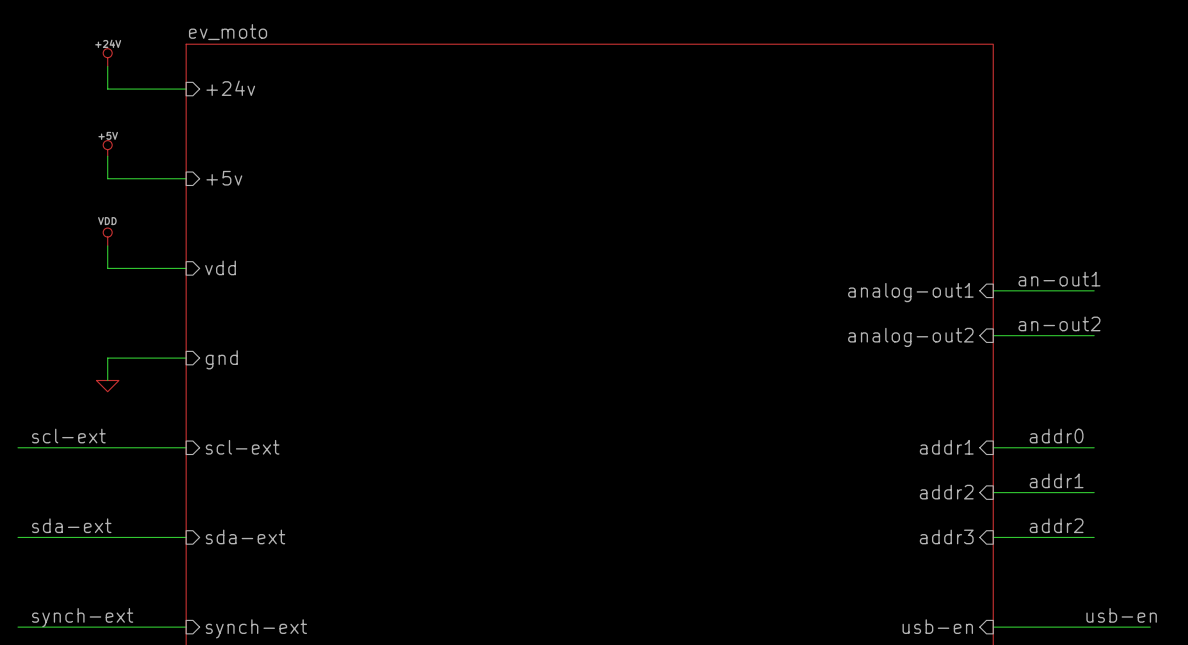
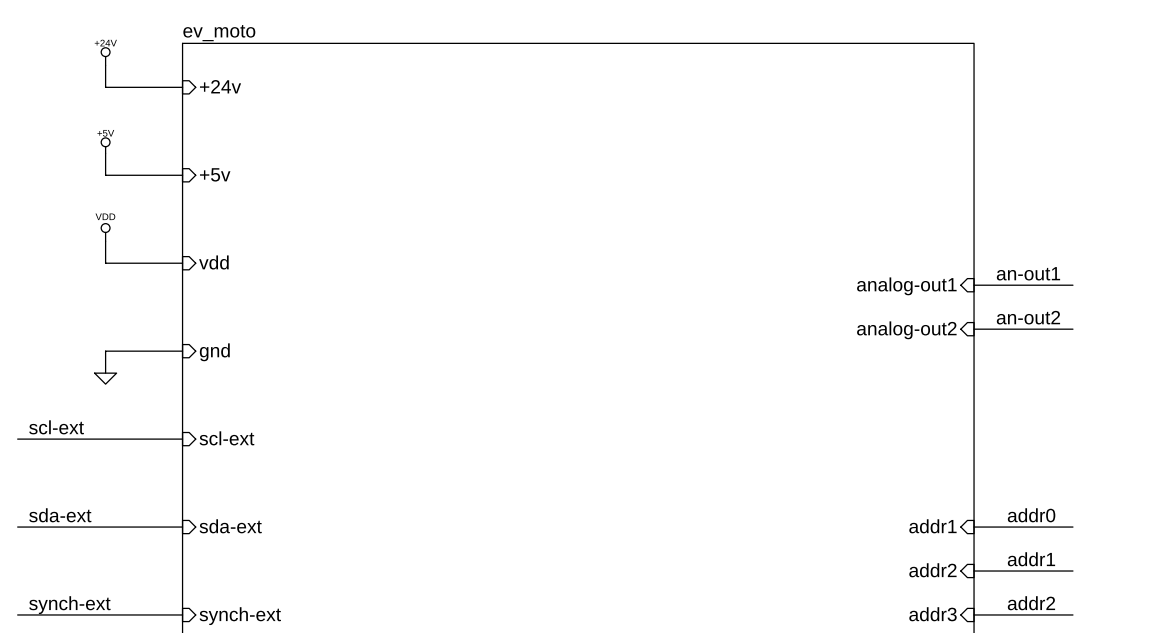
label: addr0 (1056, 436) -> none
sheet pin: addr1 (946, 447) -> none
wire: (993, 447) (1094, 447) -> none
label position: addr1 (1056, 480) -> addr1 (1031, 559)
sheet pin position: addr2 (946, 492) -> addr2 (932, 570)
wire: (993, 492) (1094, 492) -> (974, 571) (1072, 571)
label: addr2 (1056, 525) -> addr0 (1031, 515)
sheet pin: addr3 (946, 536) -> addr1 (932, 526)
label: none -> addr2 (1031, 603)
label: usb-en (1121, 615) -> none
sheet pin: usb-en (937, 626) -> addr3 (933, 614)
wire: (1094, 627) (1150, 627) -> none

